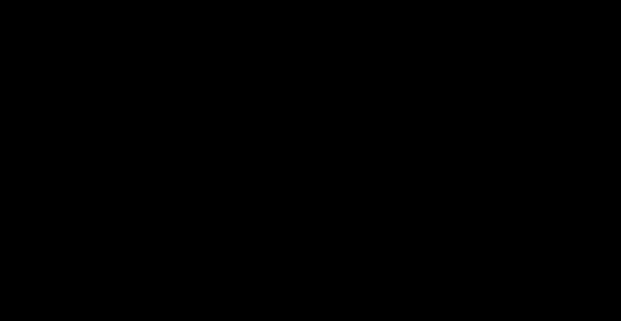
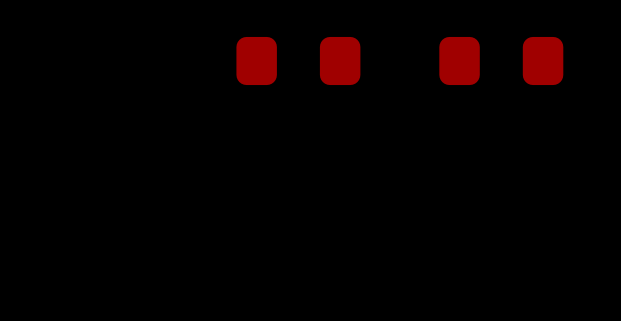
part: none -> (298, 60)
part: none -> (501, 60)

